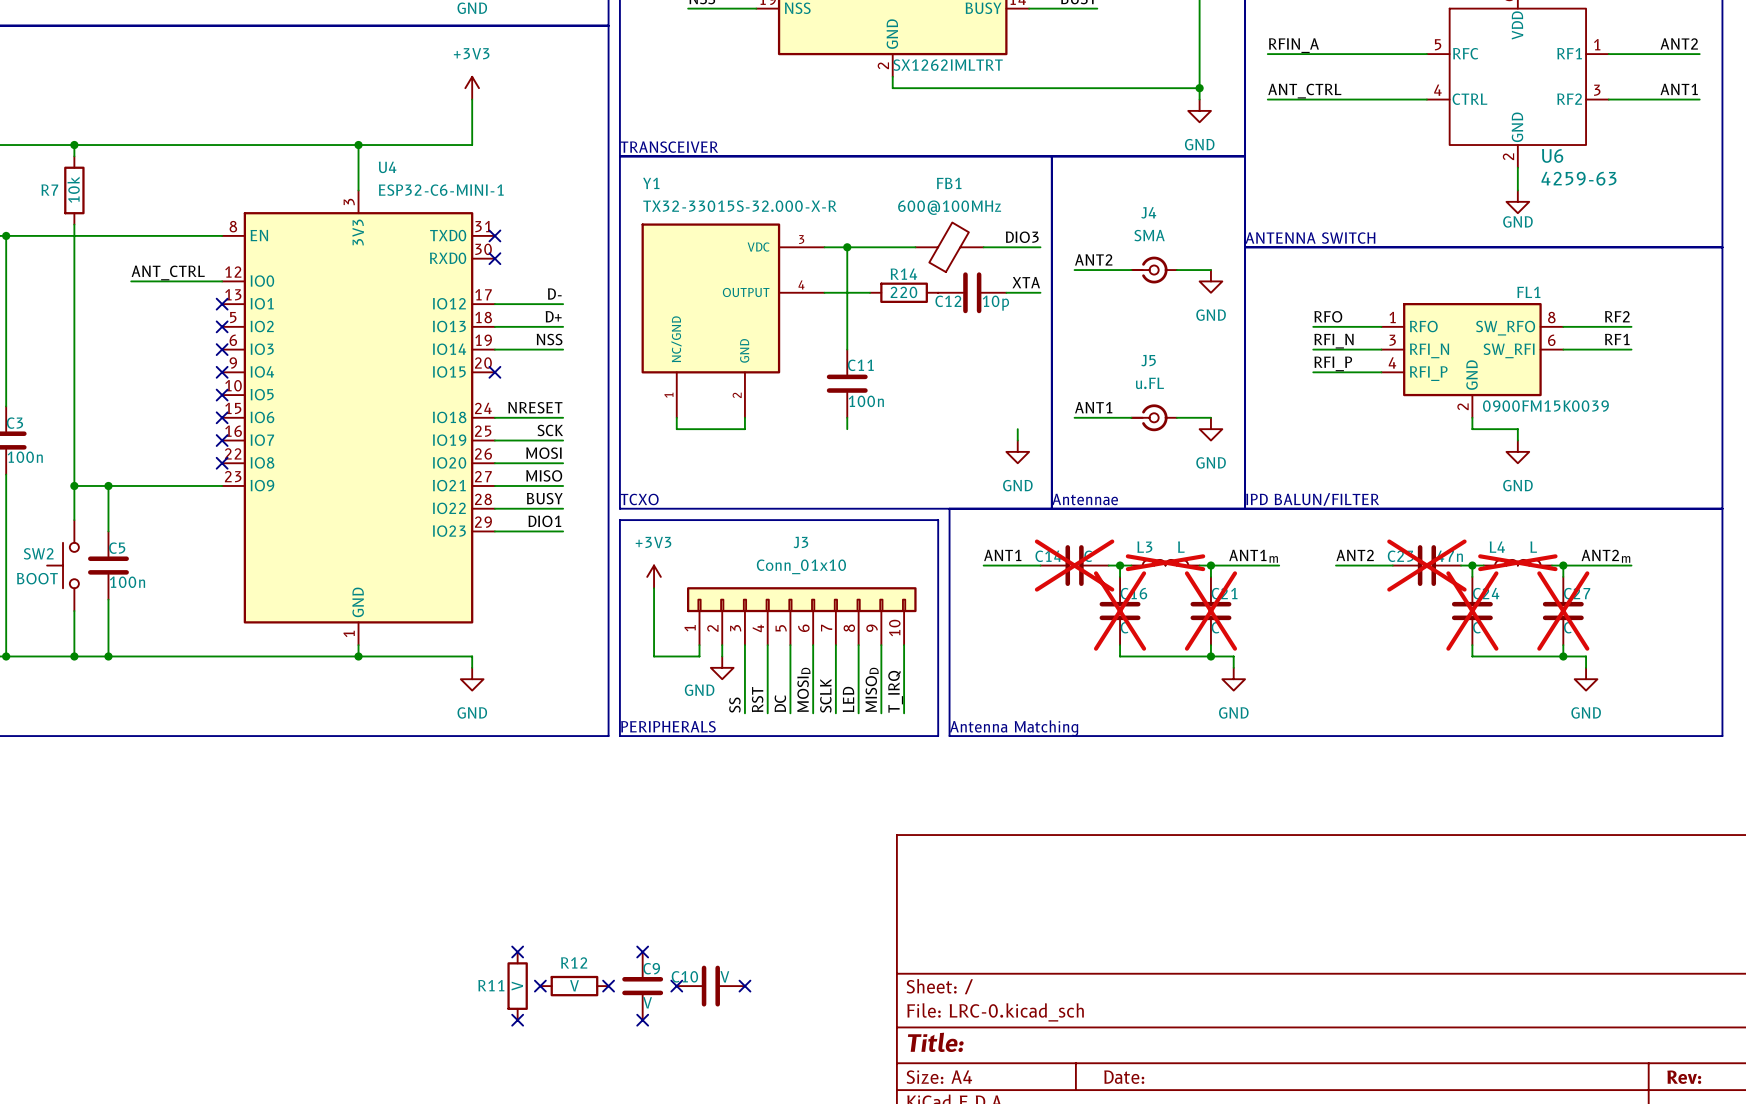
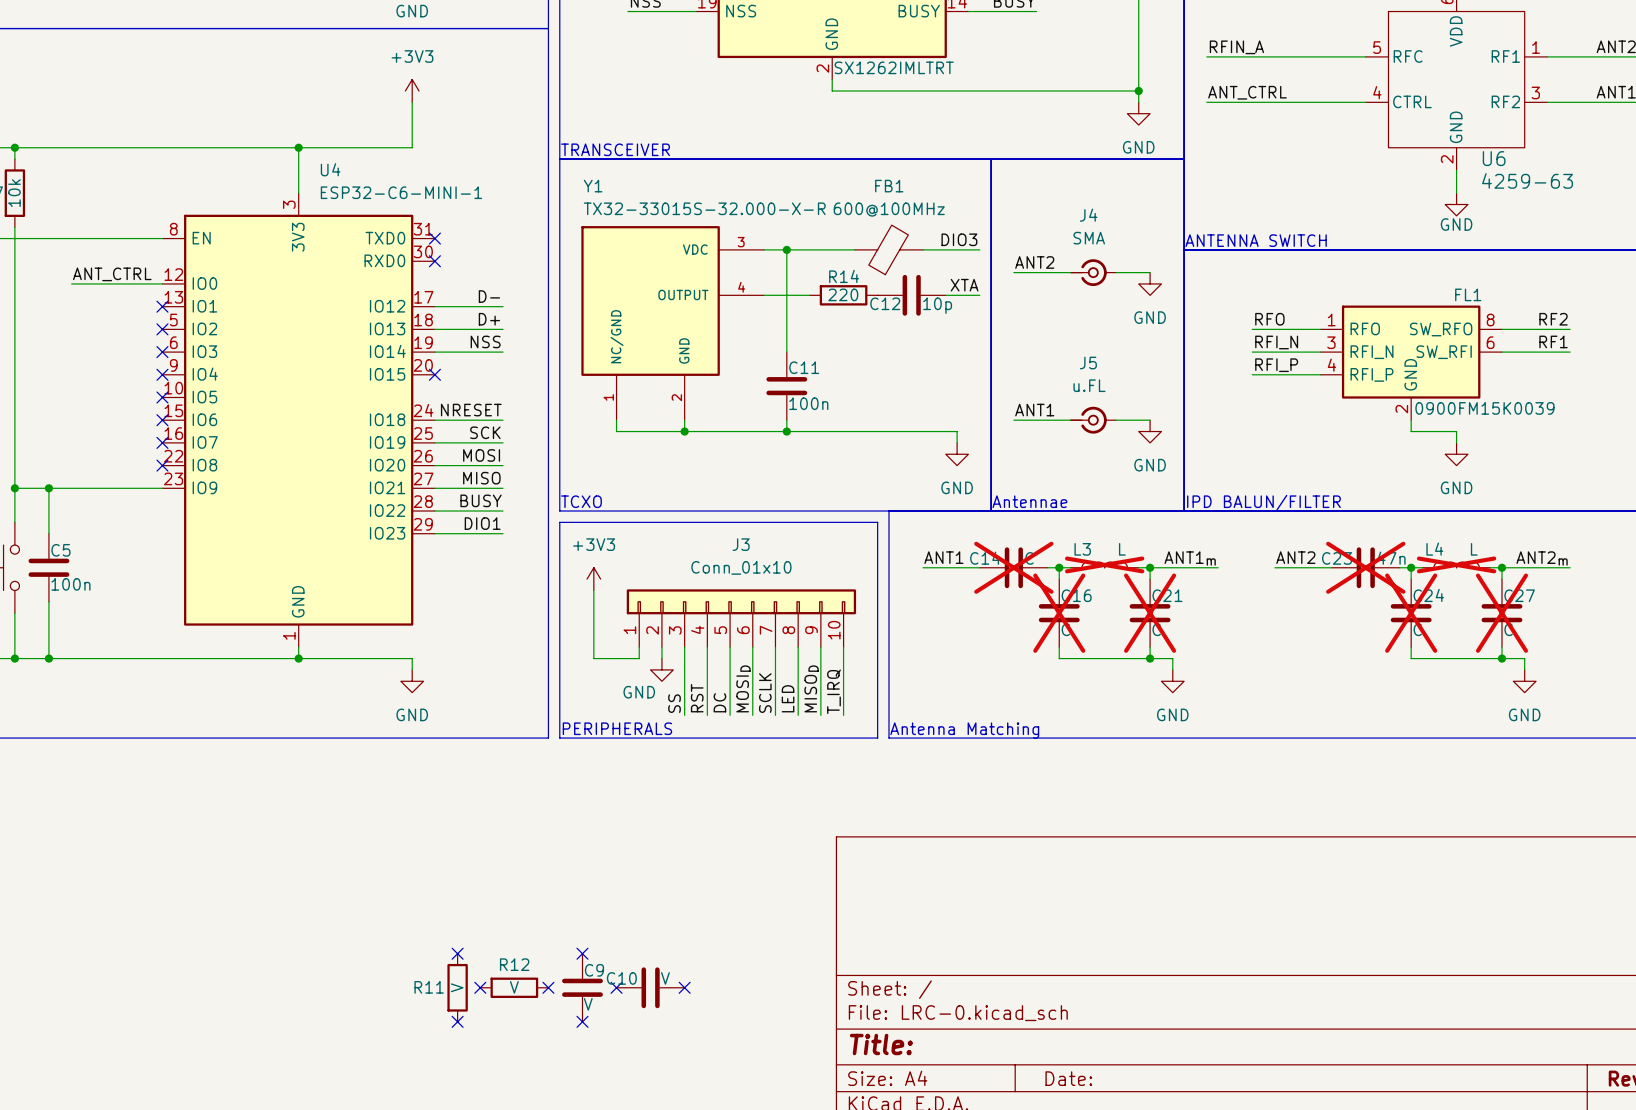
wire: none -> (684, 431) (957, 431)
junction: none -> (684, 431)
junction: none -> (786, 431)

